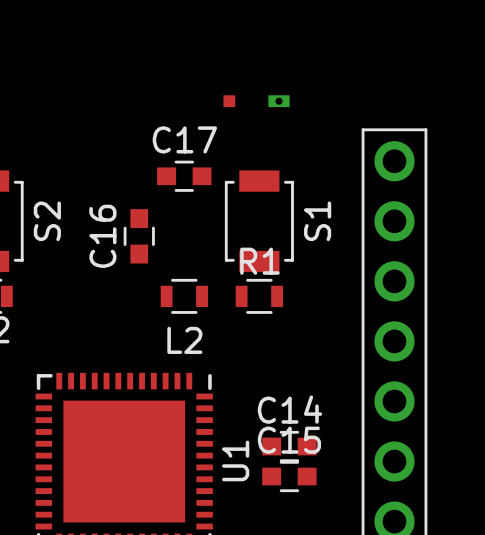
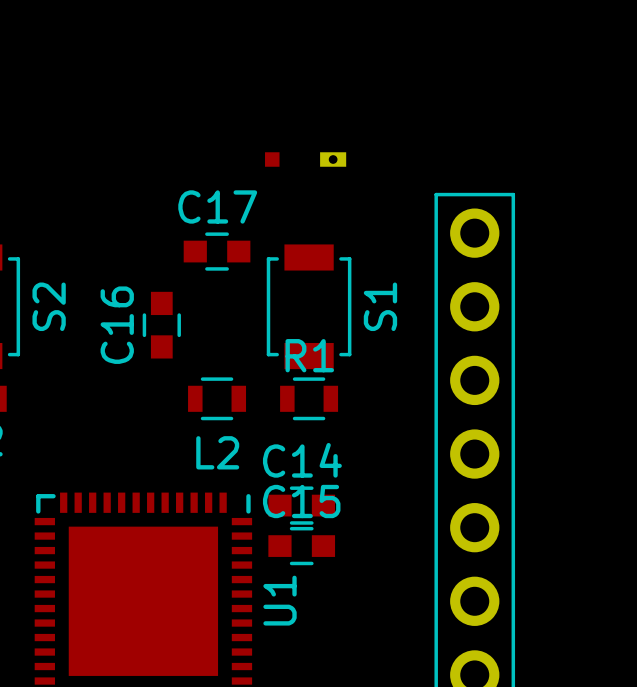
C14 position: (289, 446) -> (301, 505)
C15 position: (289, 476) -> (301, 546)

